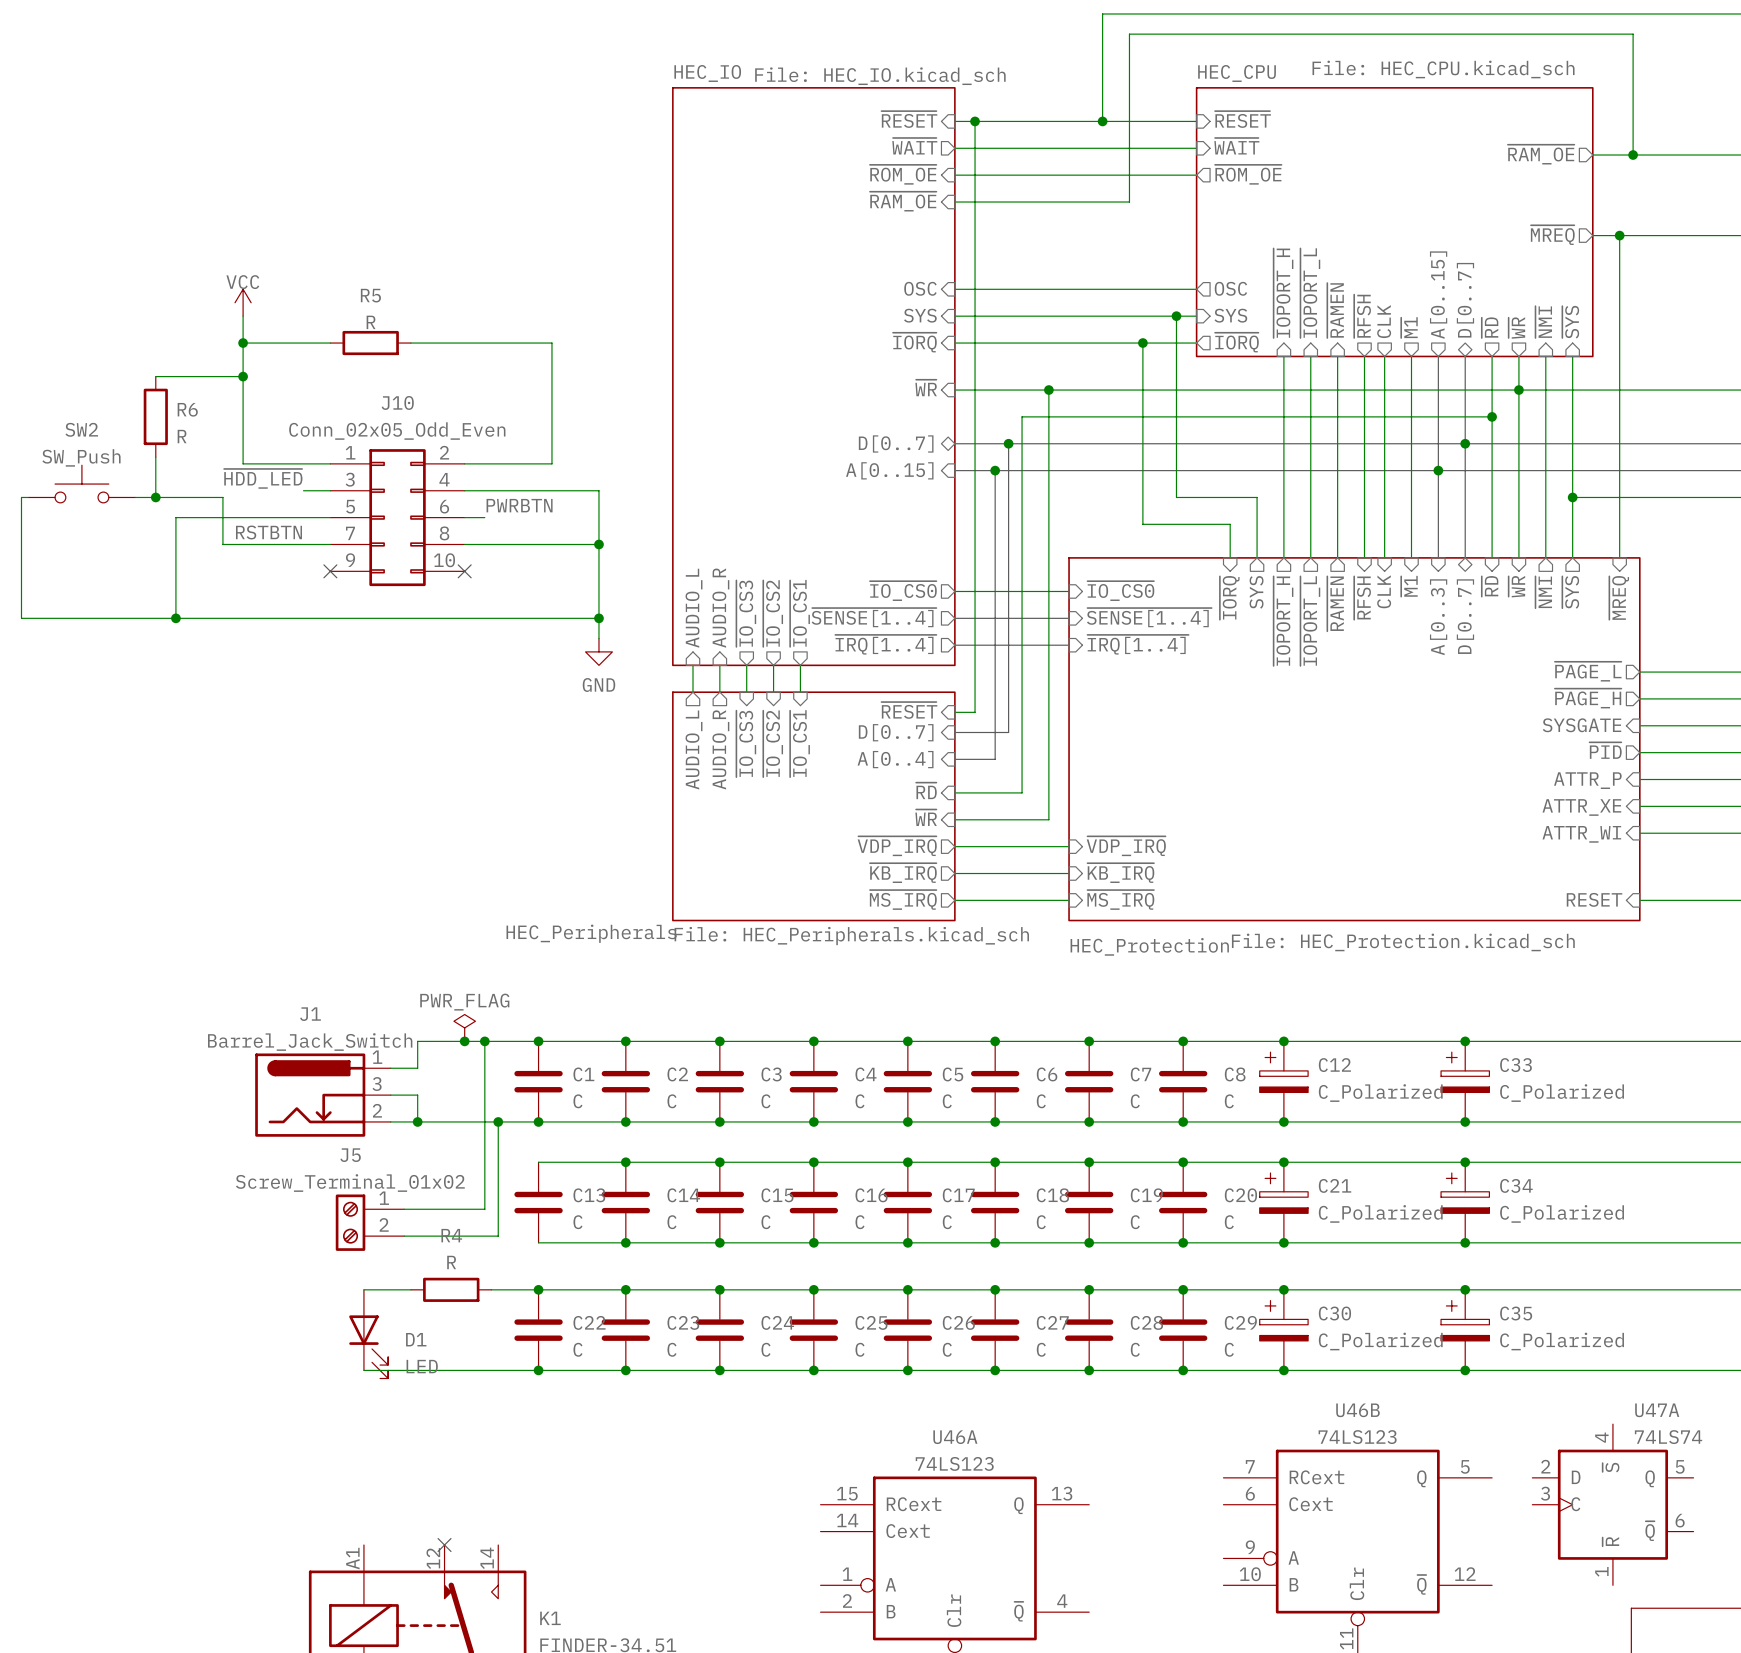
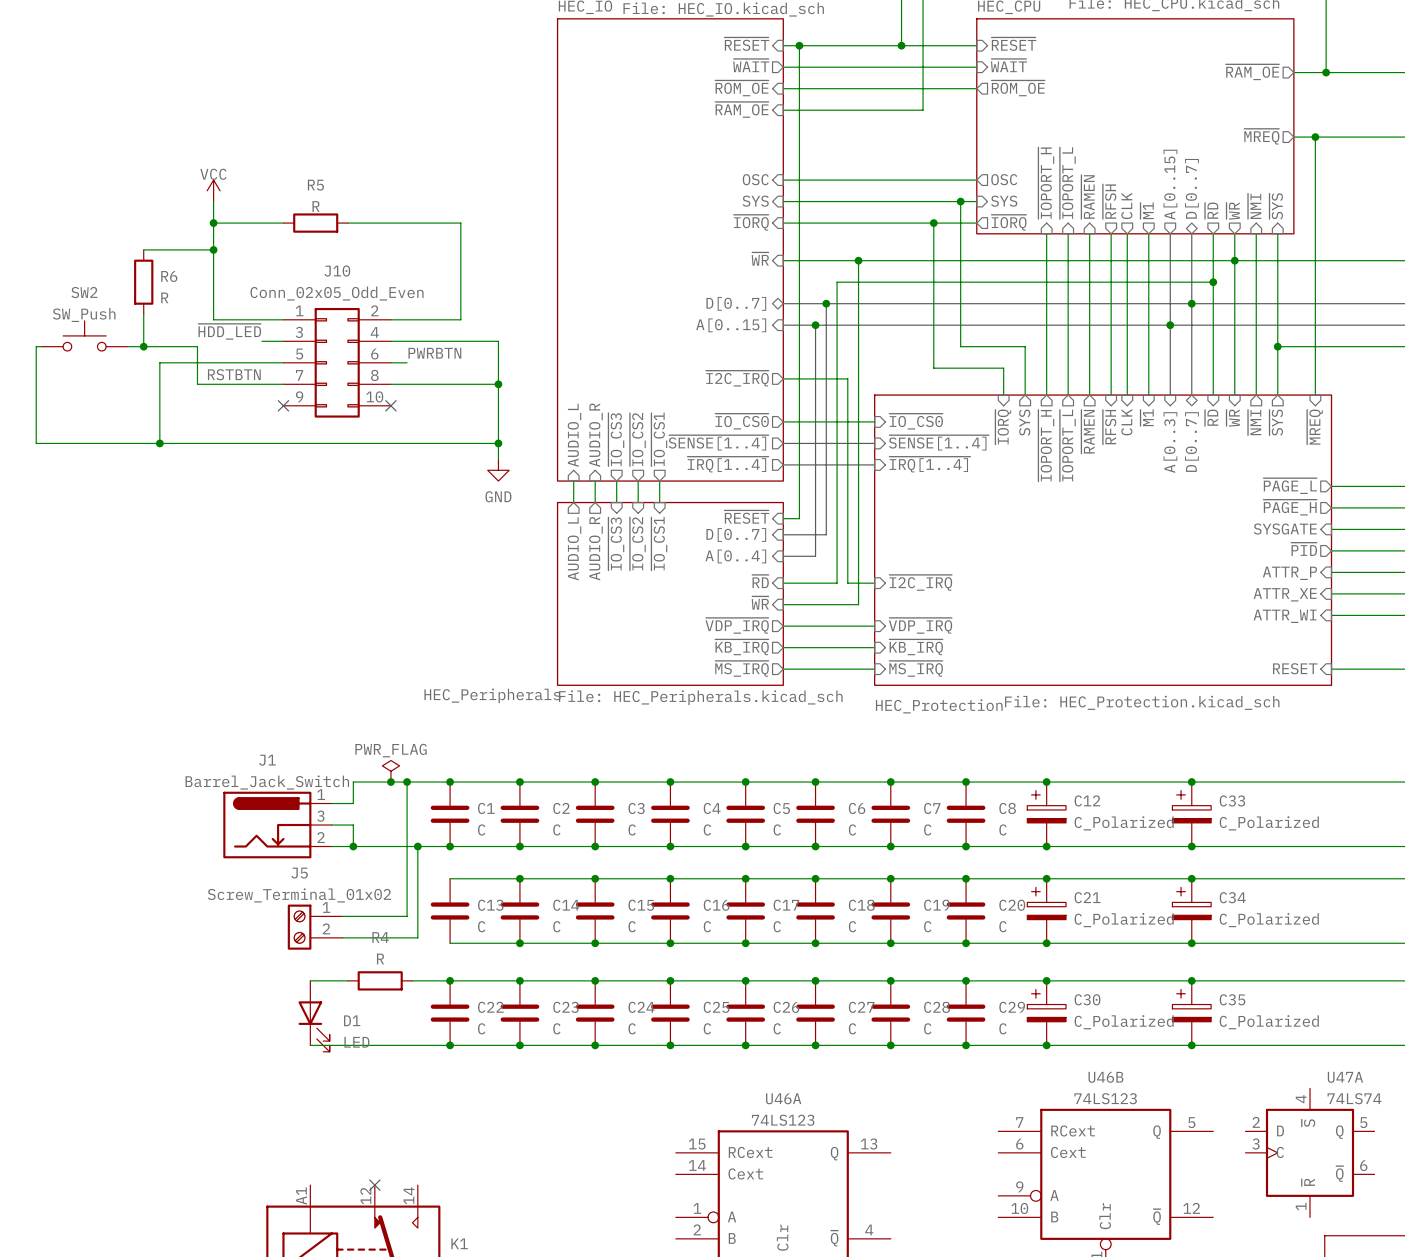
sheet pin: none -> ~{I2C_IRQ} (737, 378)
wire: none -> (783, 378) (847, 378) (847, 583) (874, 583)
sheet pin: none -> ~{I2C_IRQ} (920, 582)

